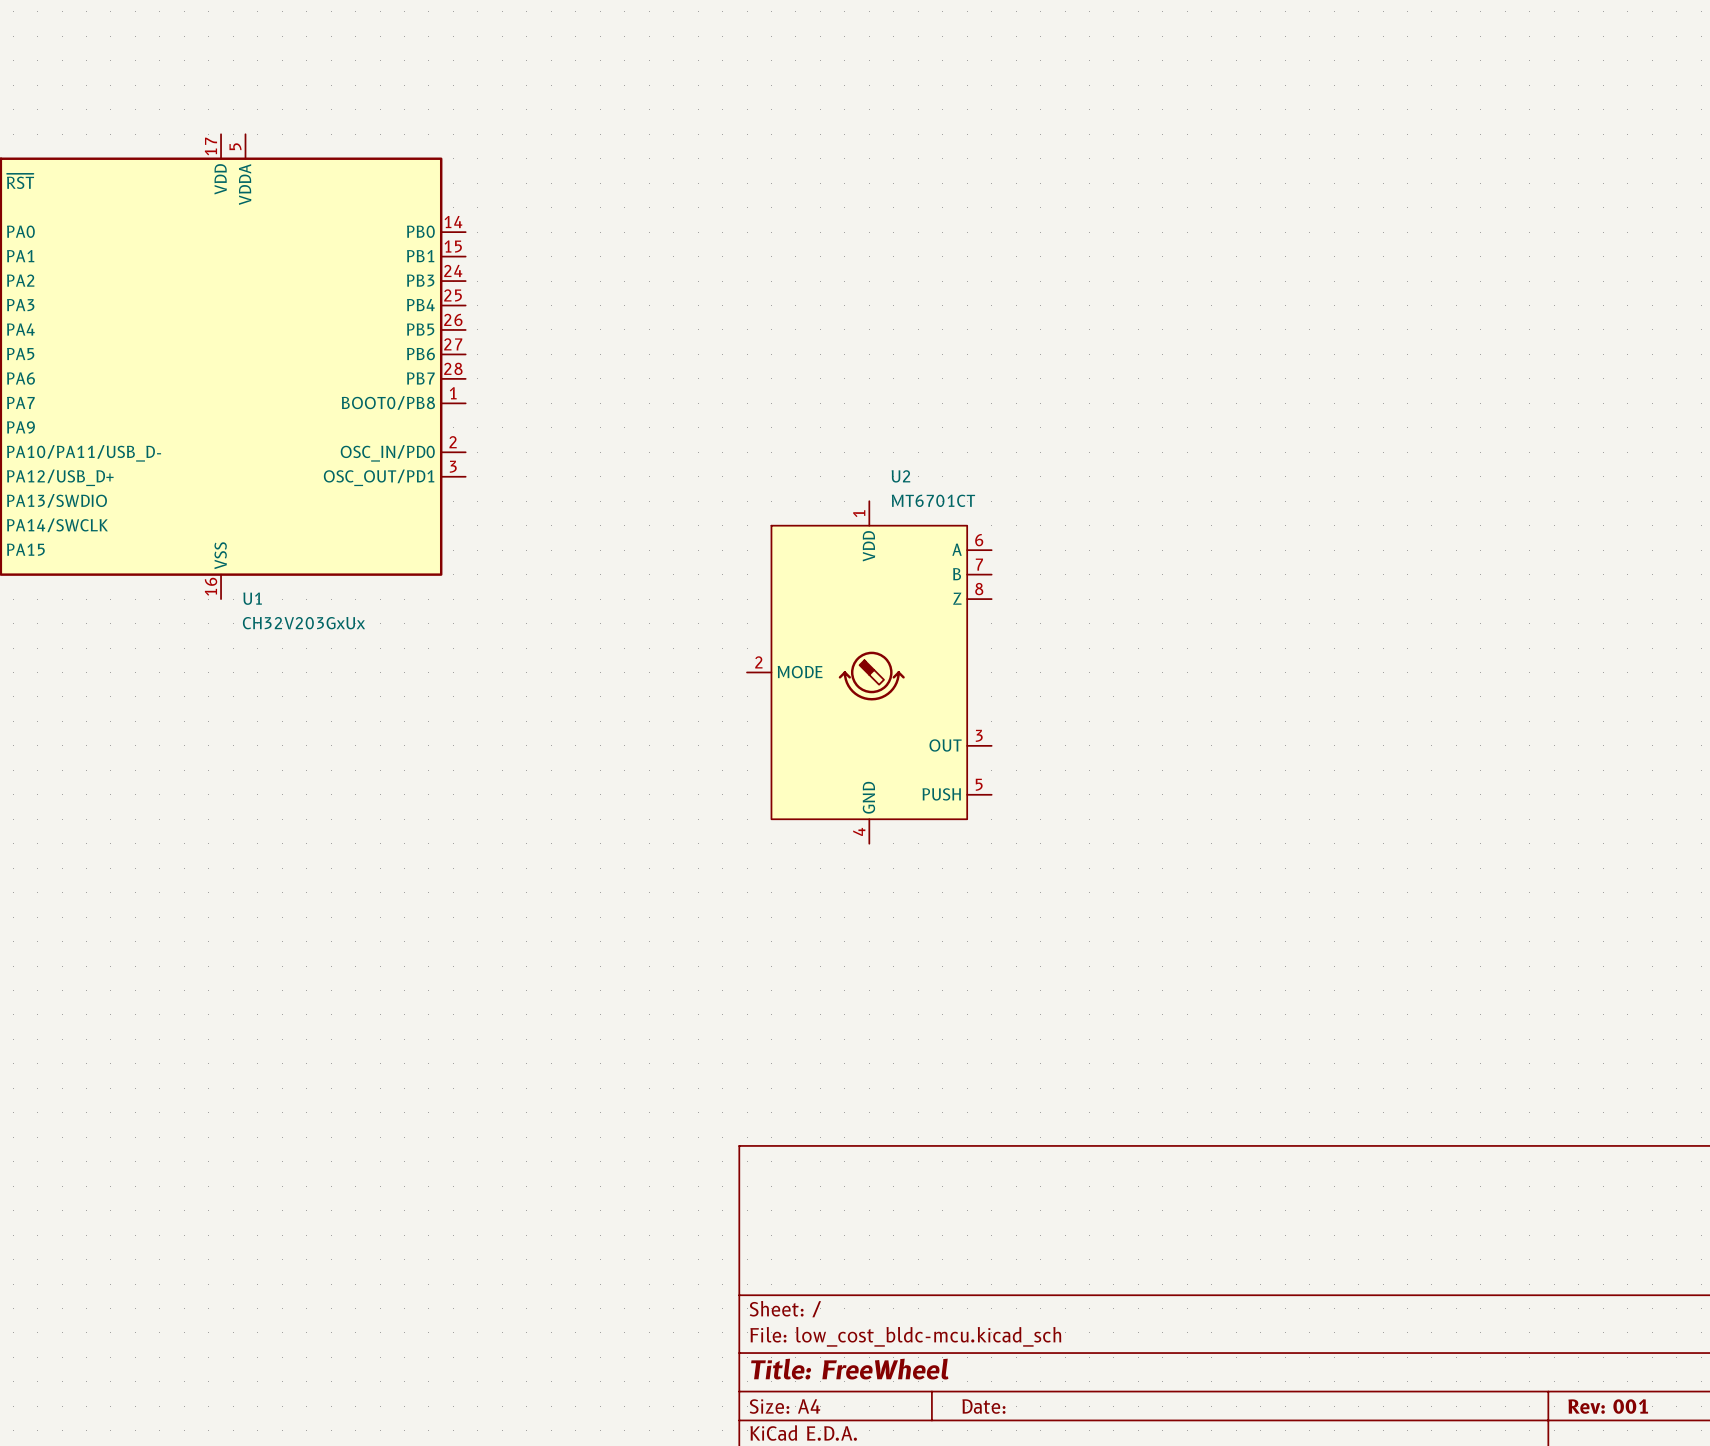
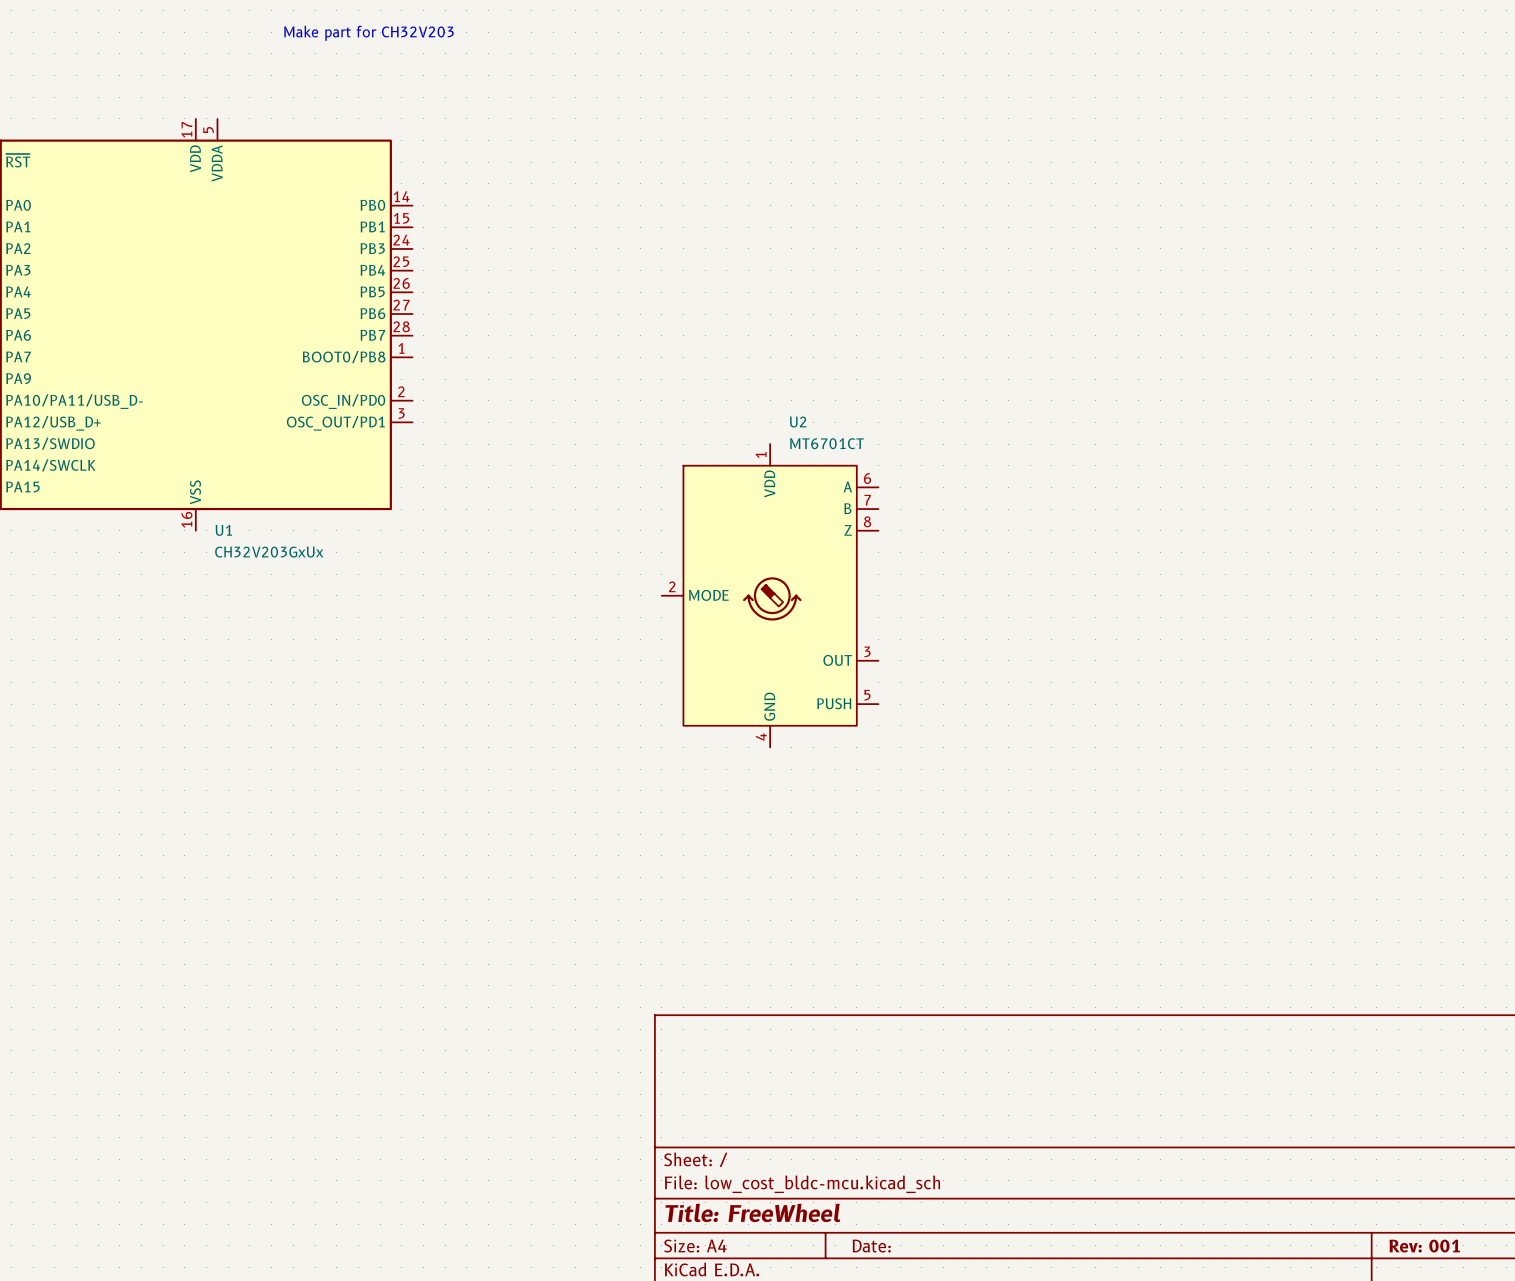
text: none -> Make part for CH32V203 (368, 33)

